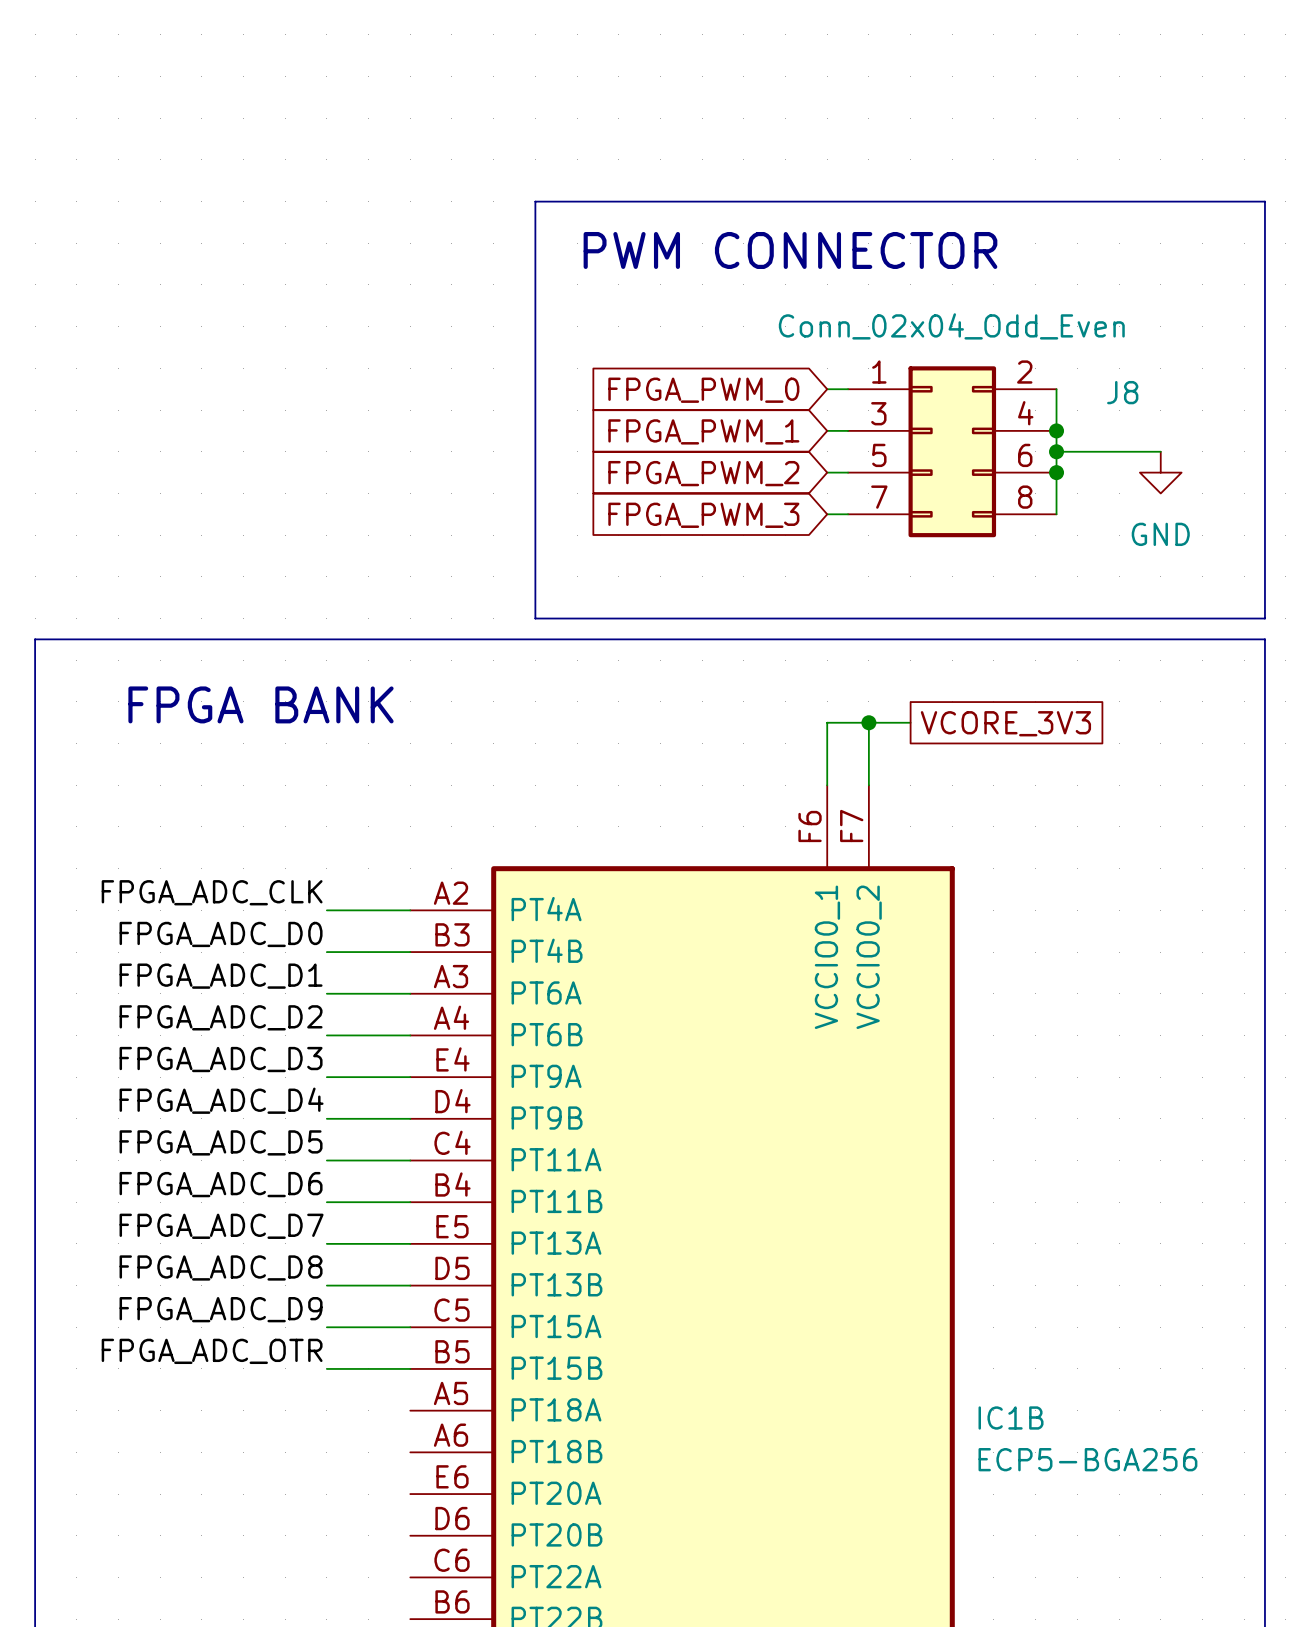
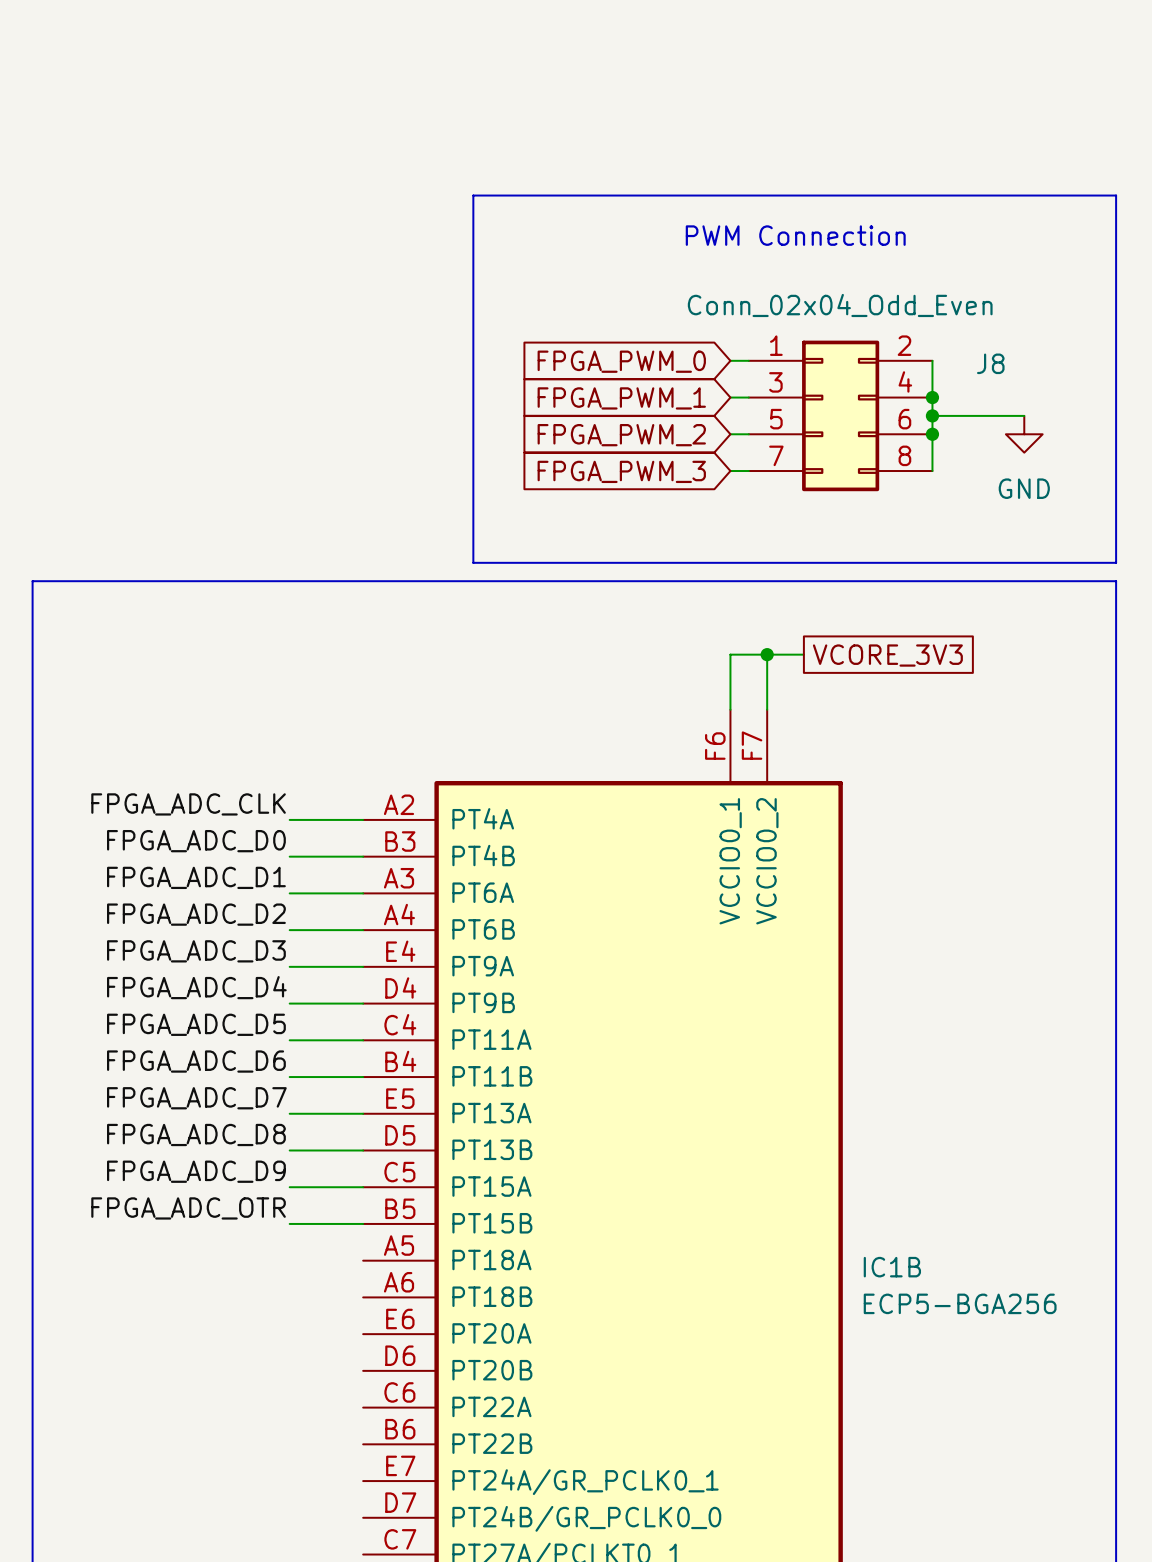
text: none -> PWM Connection (795, 235)
text: PWM CONNECTOR (790, 250) -> none
text: FPGA BANK (261, 704) -> none

